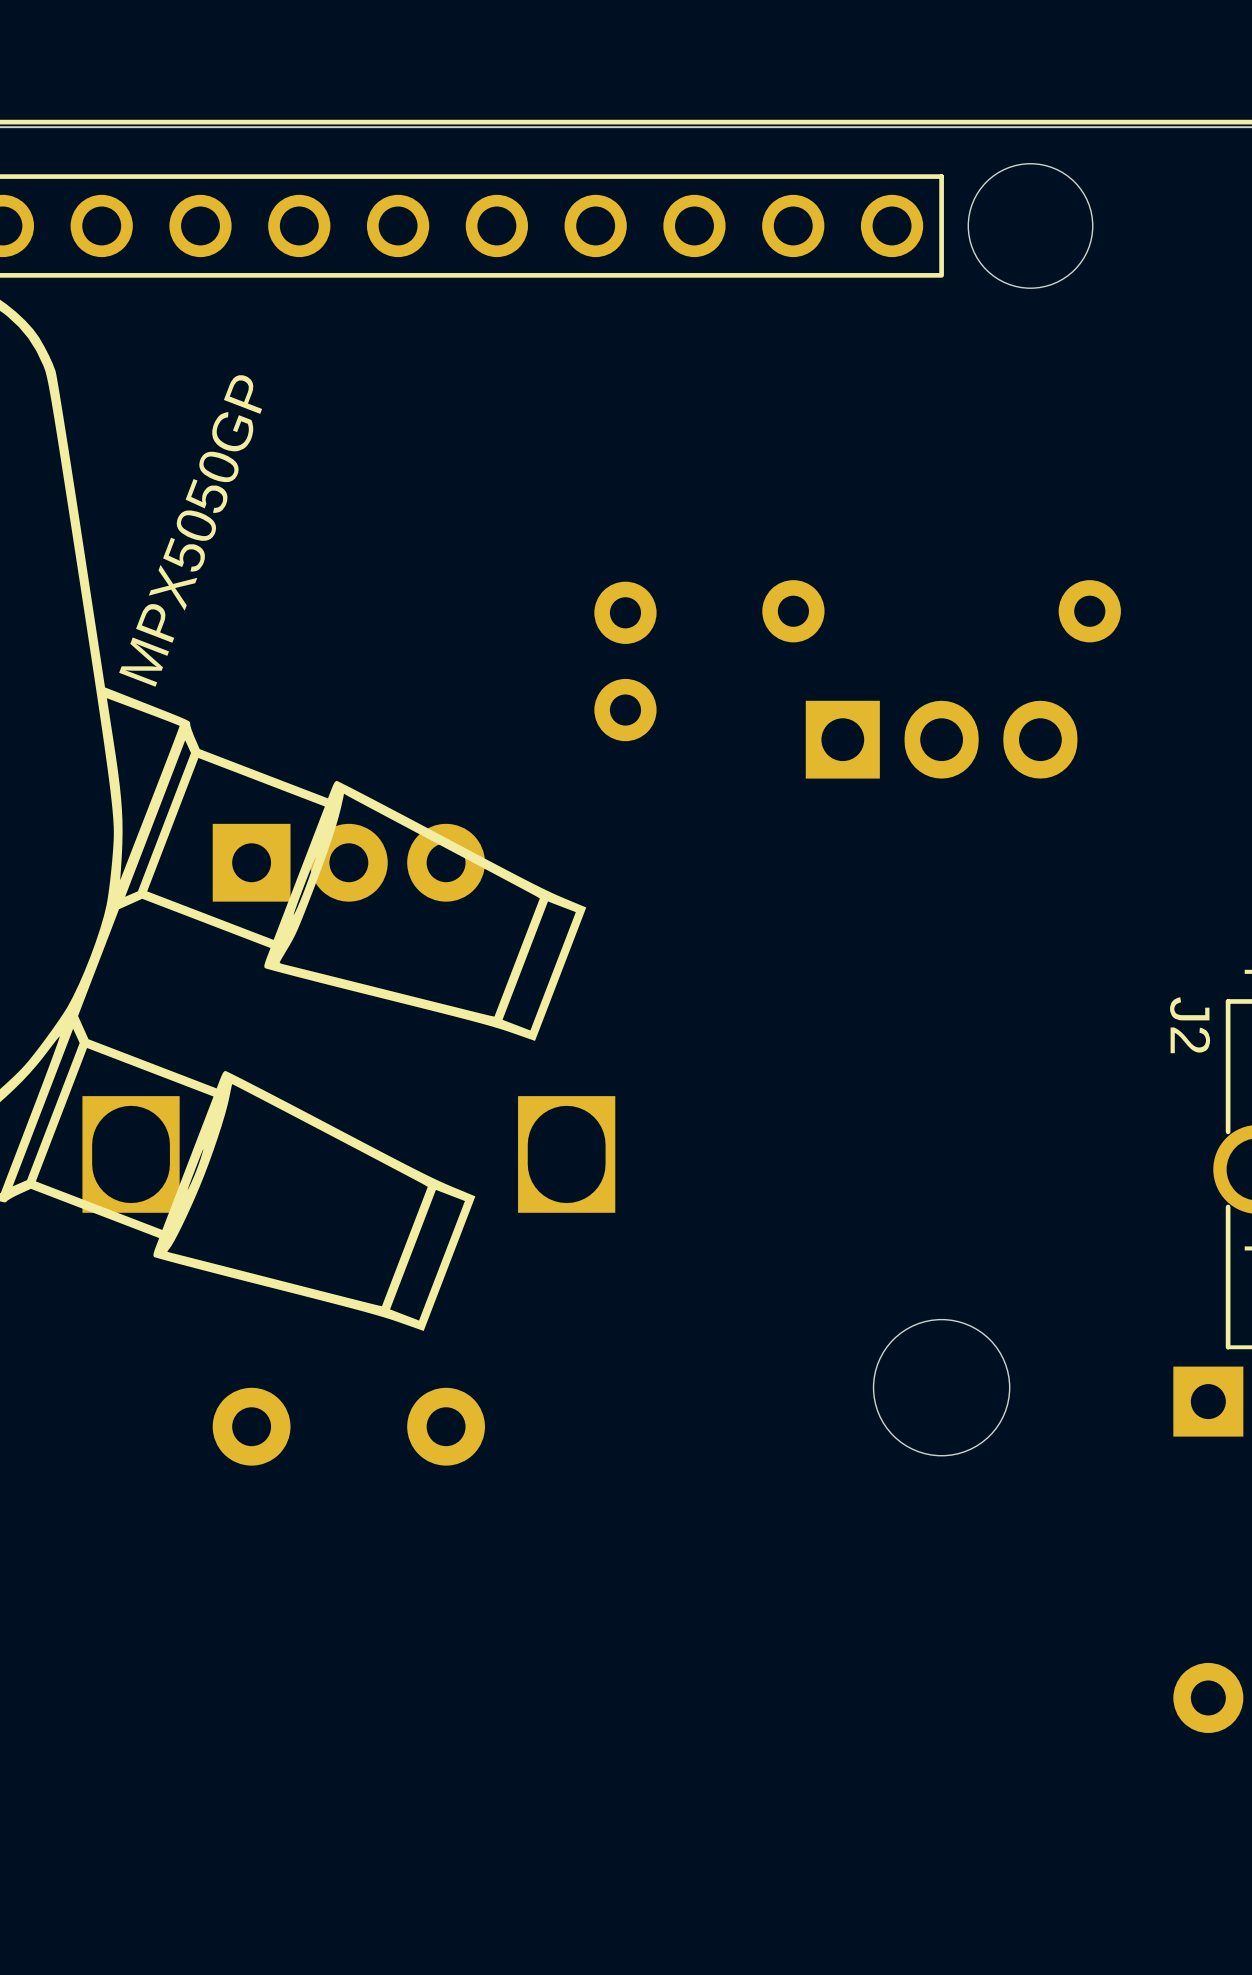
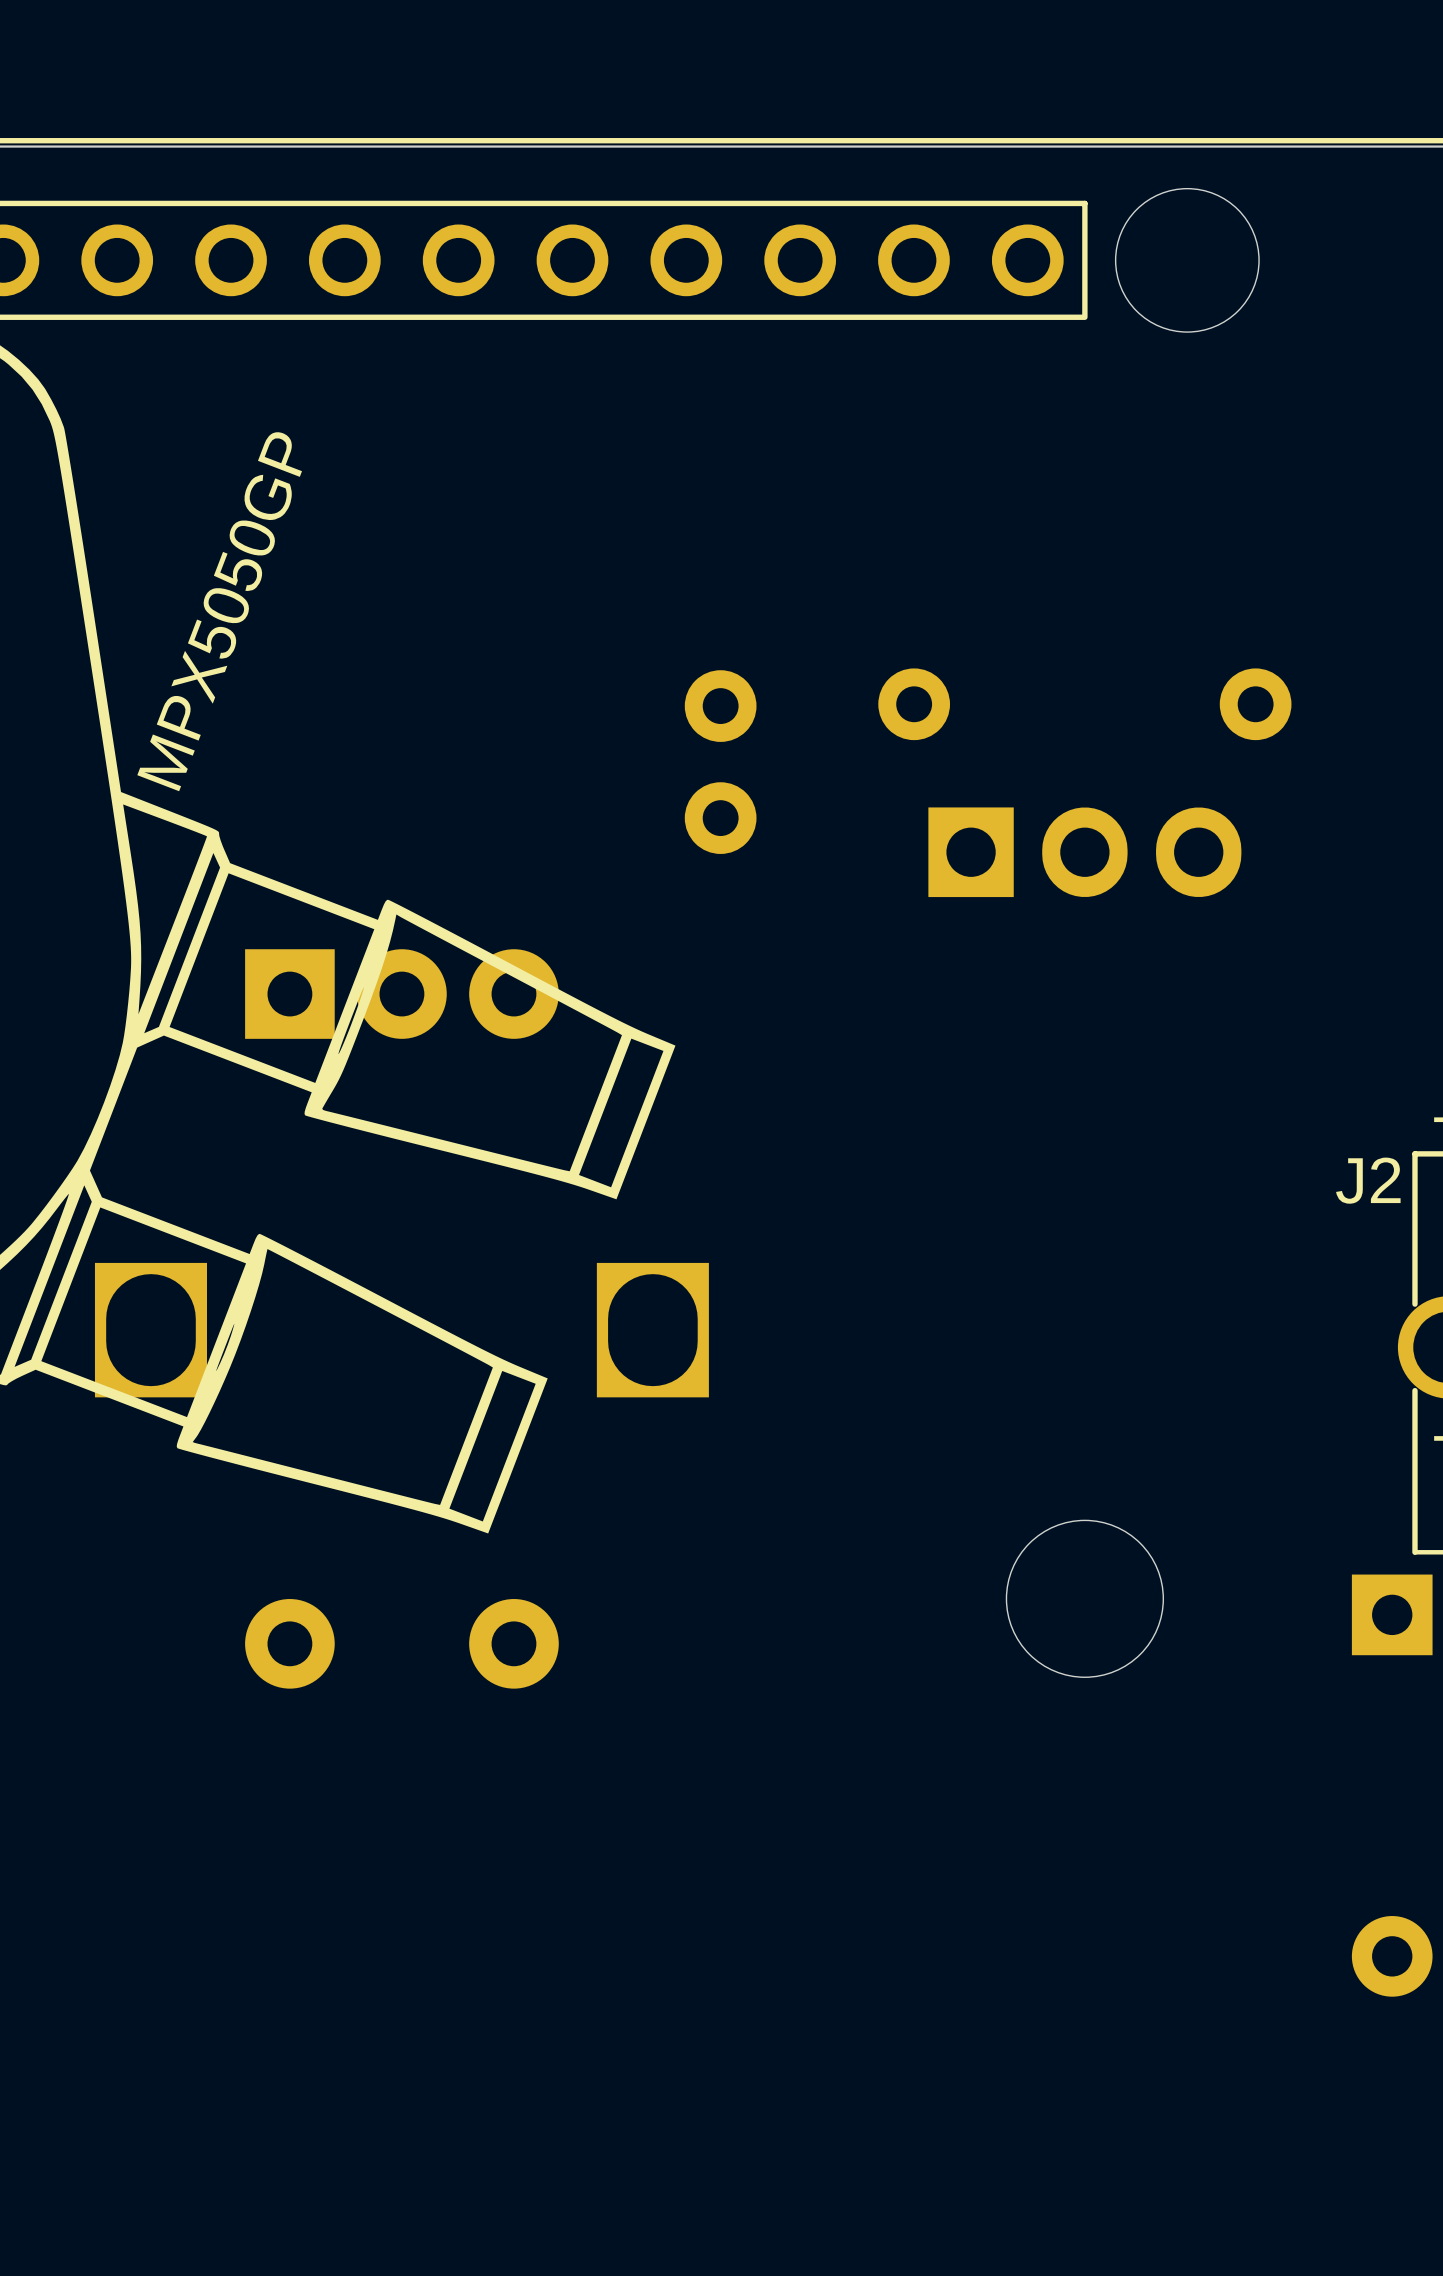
J2 name rotation: 0° (1190, 1025) -> 90° counterclockwise (1368, 1180)

